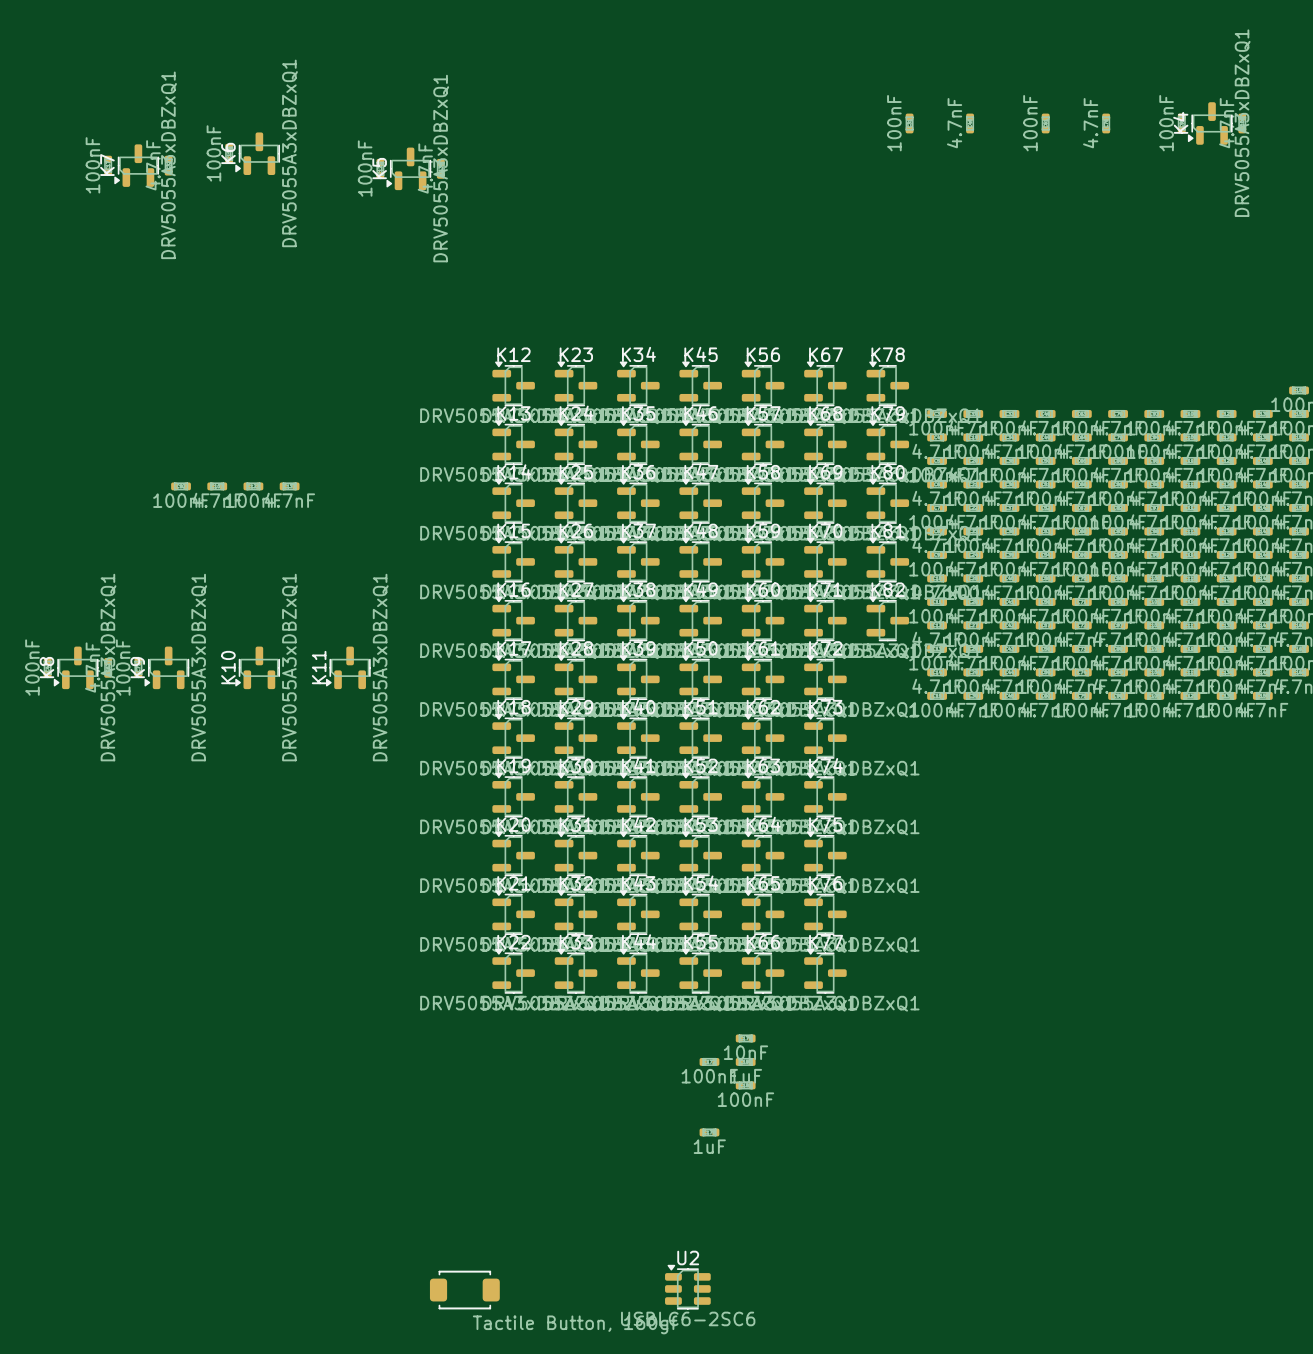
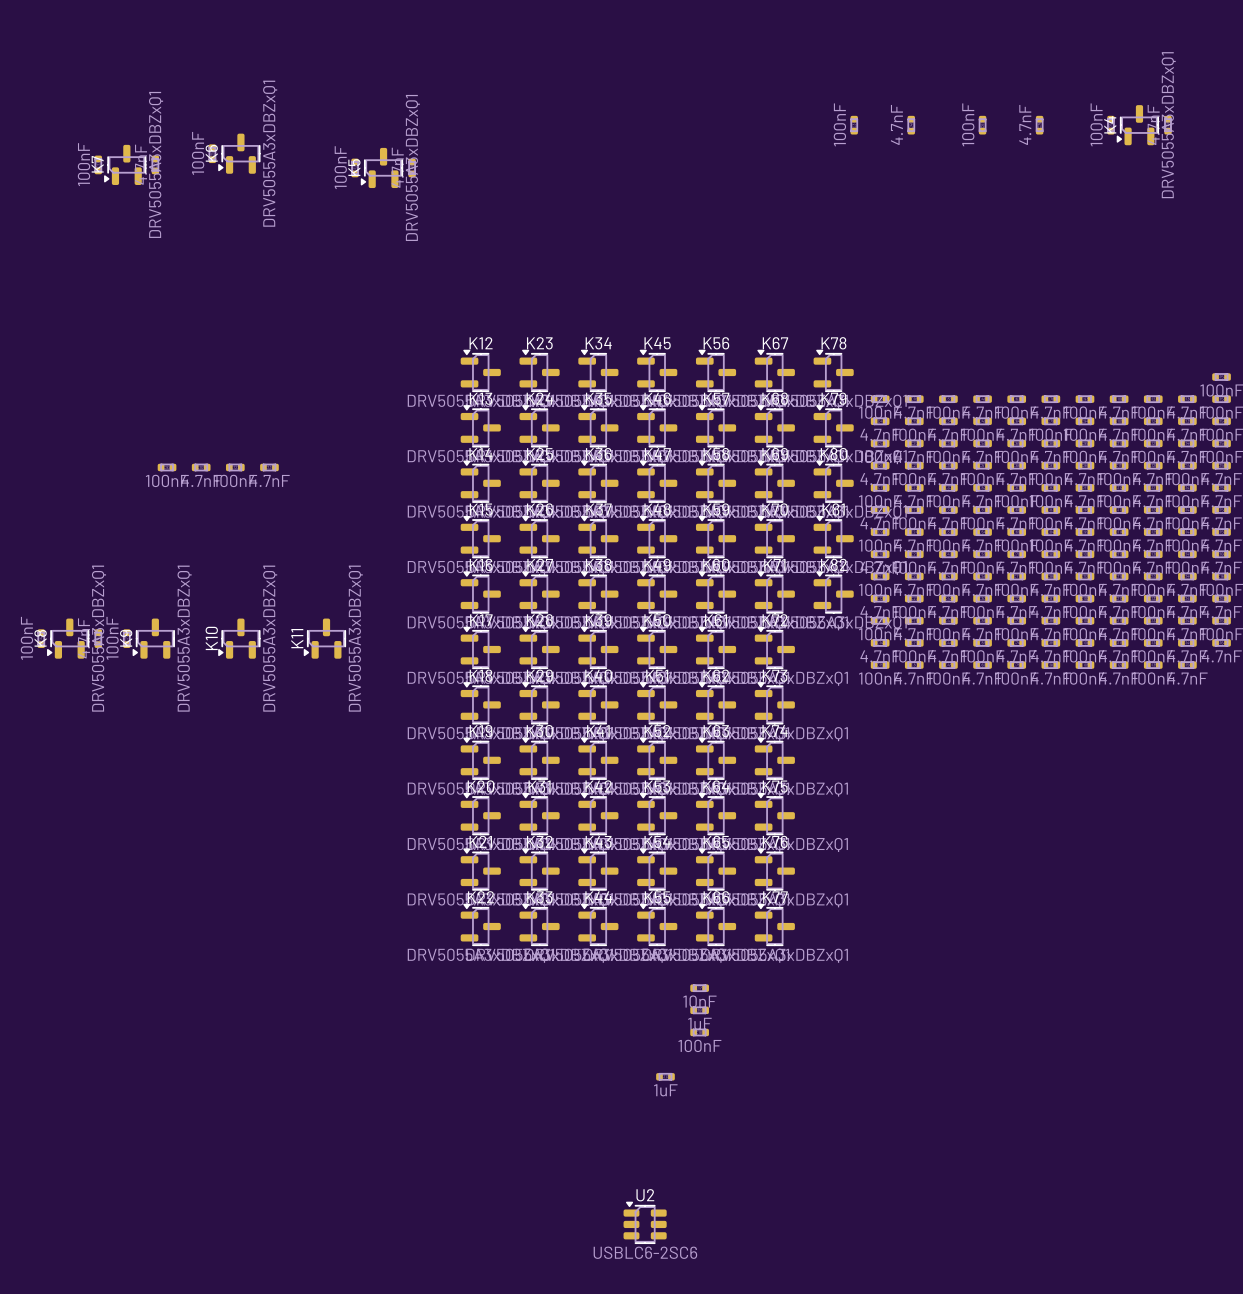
part: 100nF (709, 1061) -> none
part: Tactile Button, 160gf (464, 1290) -> none

